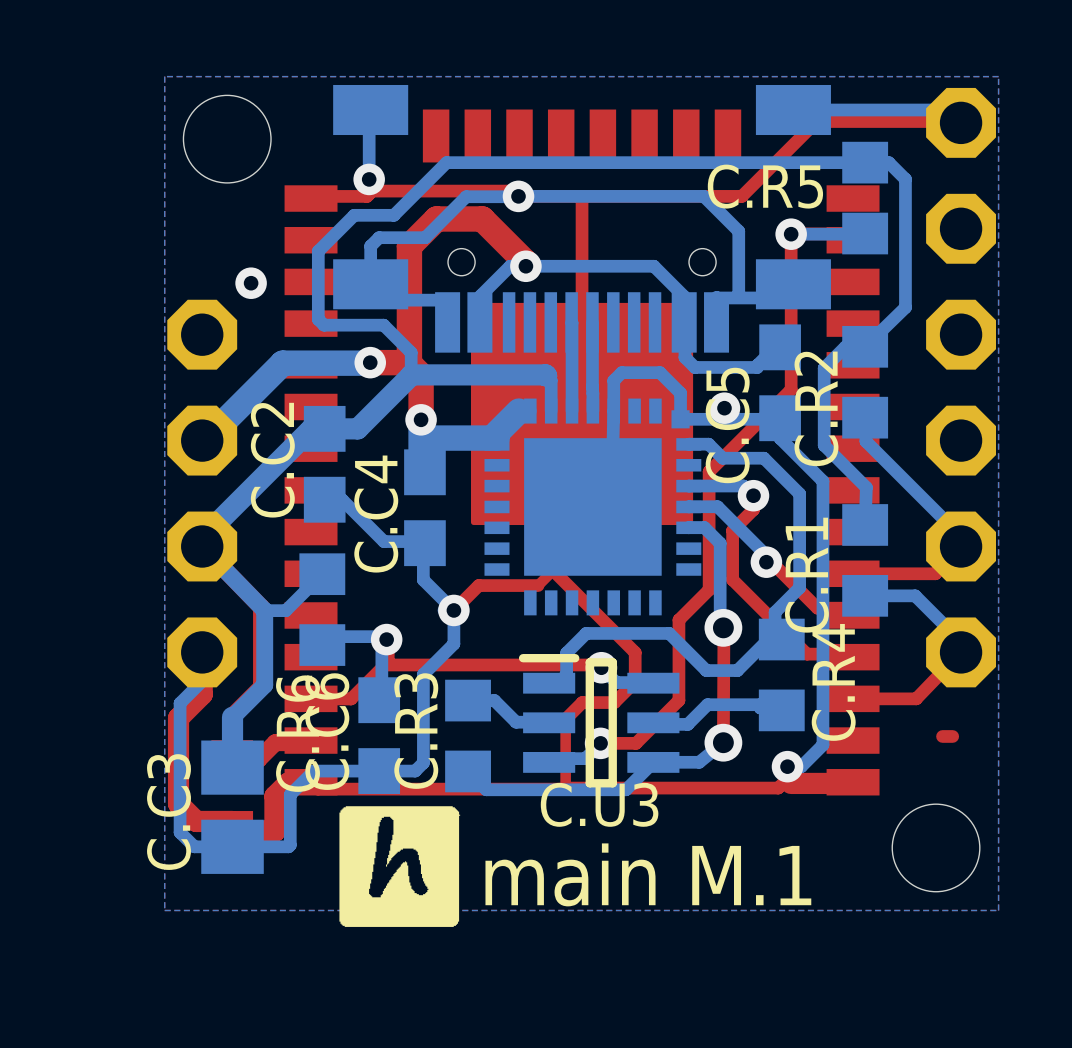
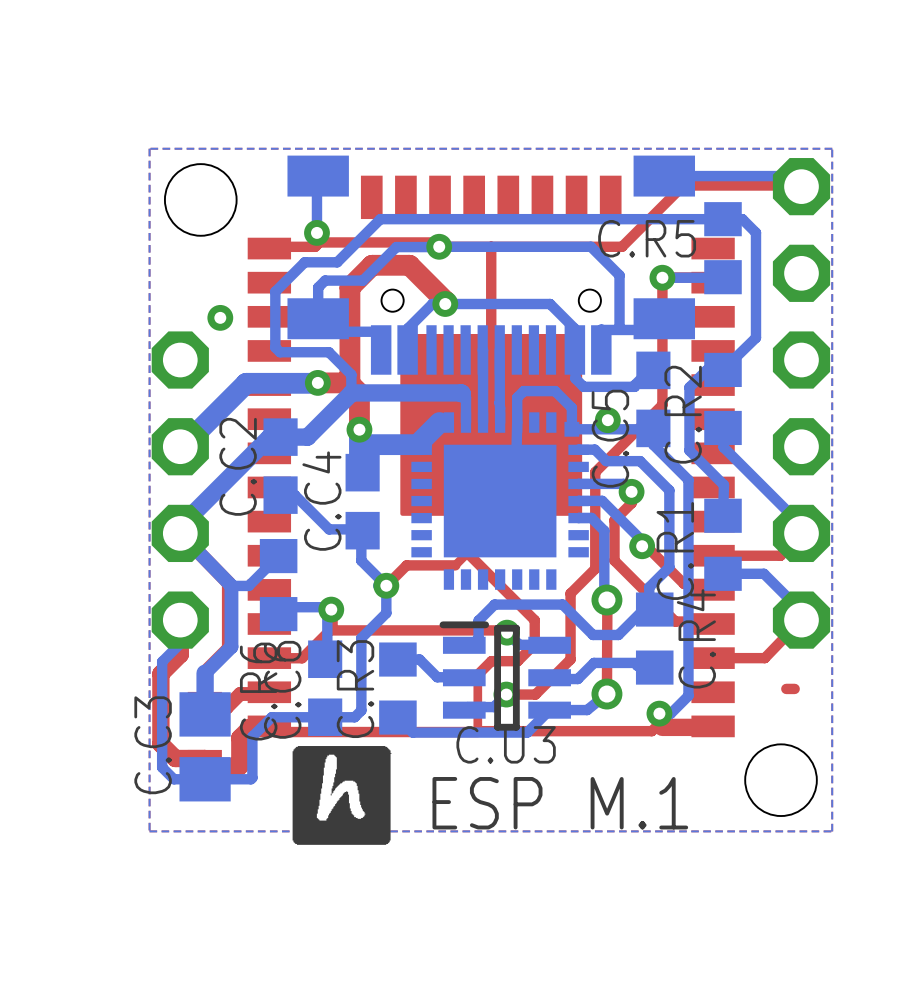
text: main M.1 (648, 874) -> ESP M.1 (560, 803)

